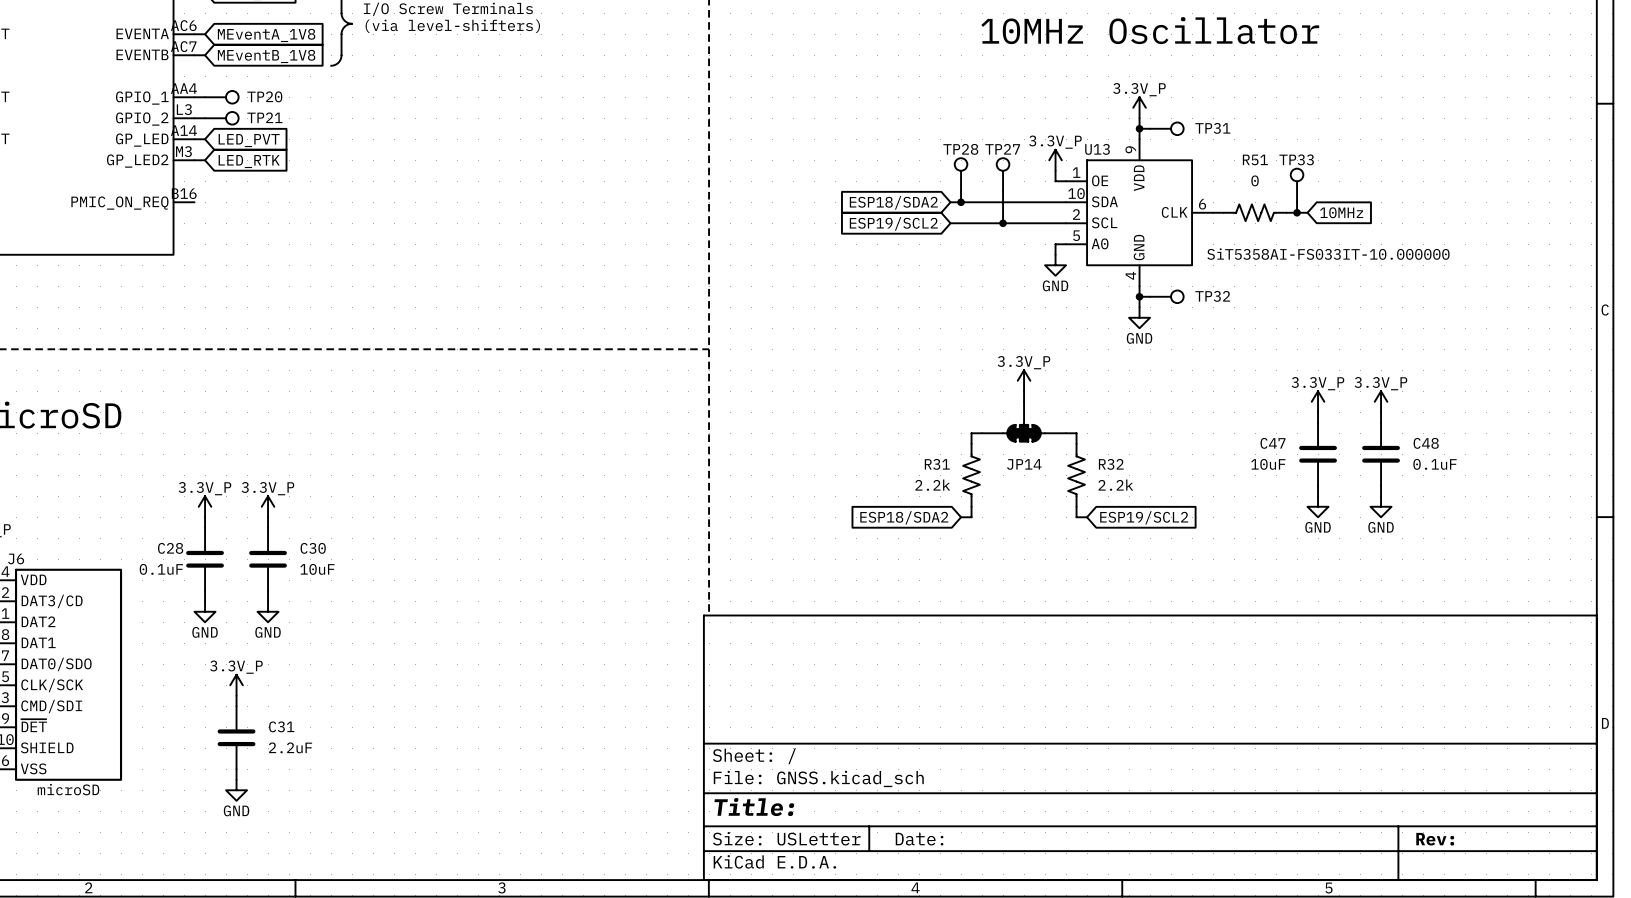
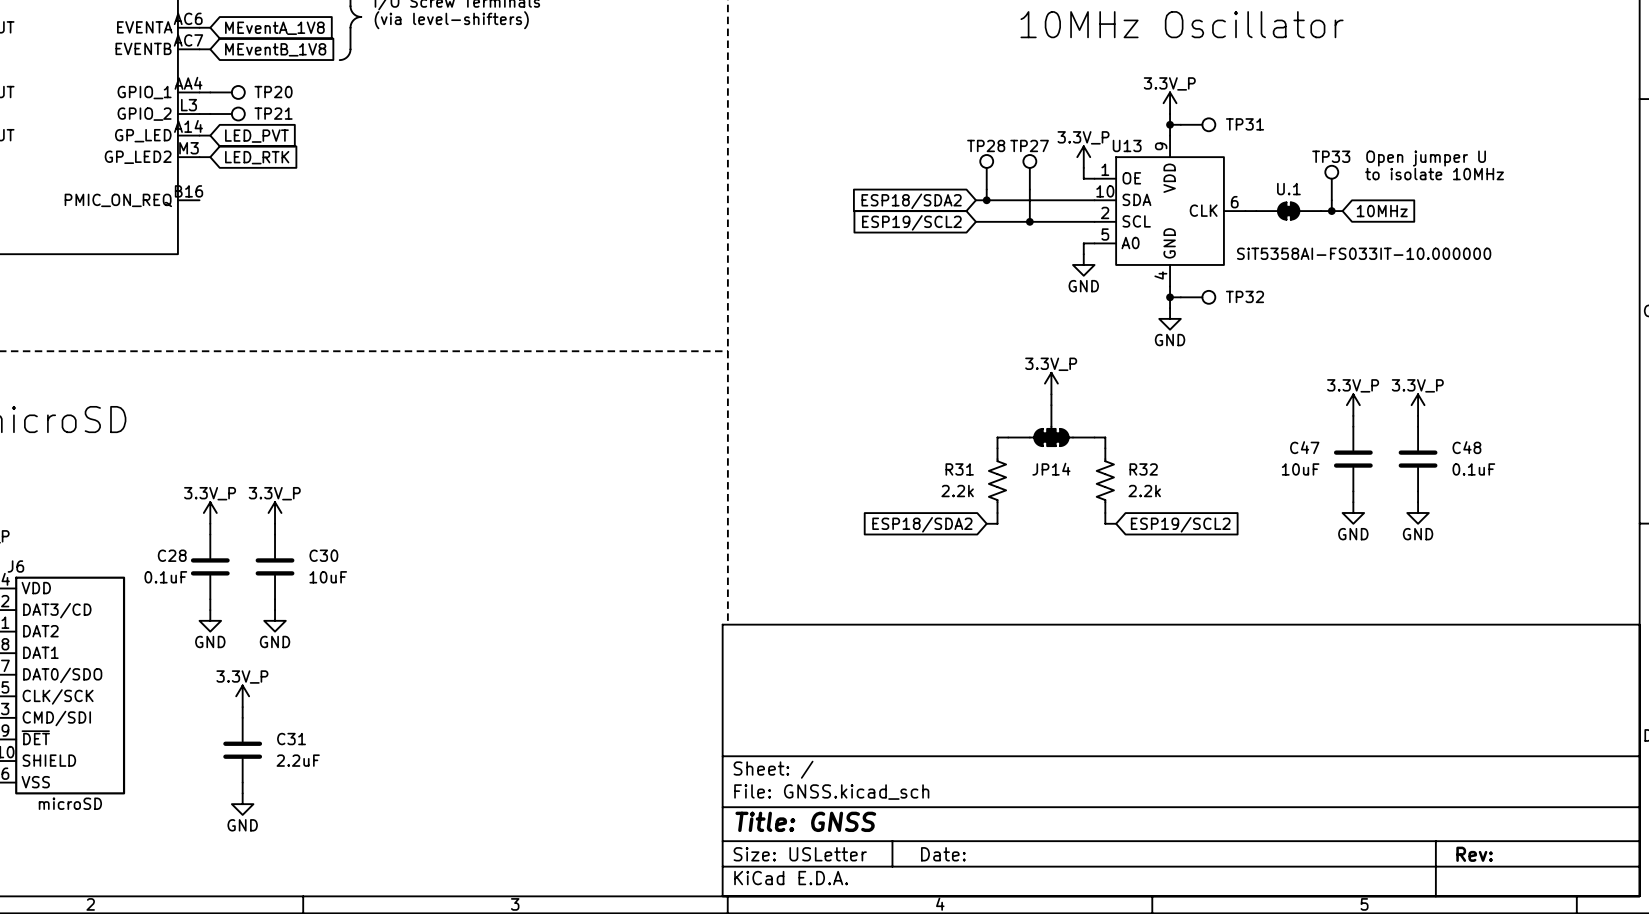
text: none -> Open jumper U (1426, 158)
text: none -> to isolate 10MHz (1434, 174)
R51: 0 (1255, 212) -> none
U.1: none -> (1288, 211)
title block: Title: (754, 807) -> Title: GNSS (805, 821)

